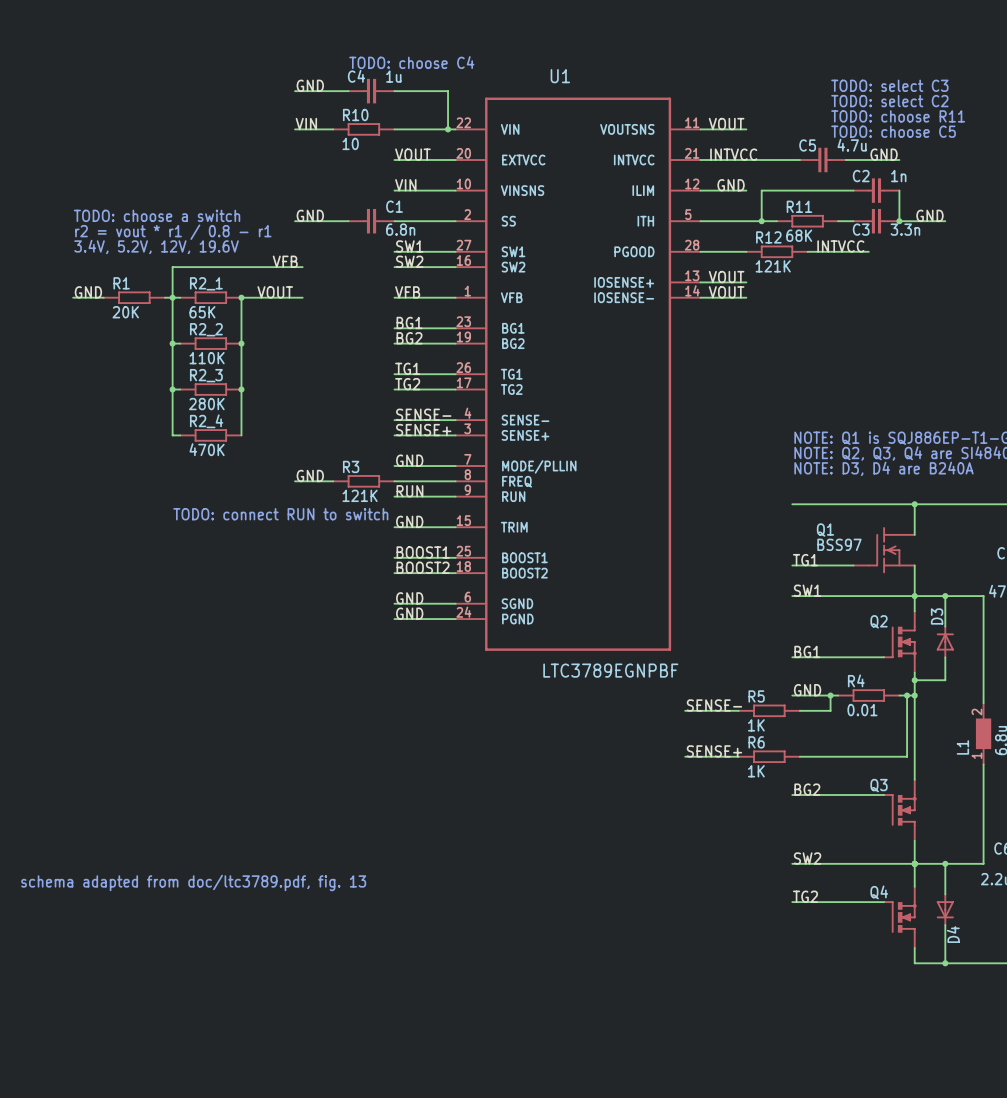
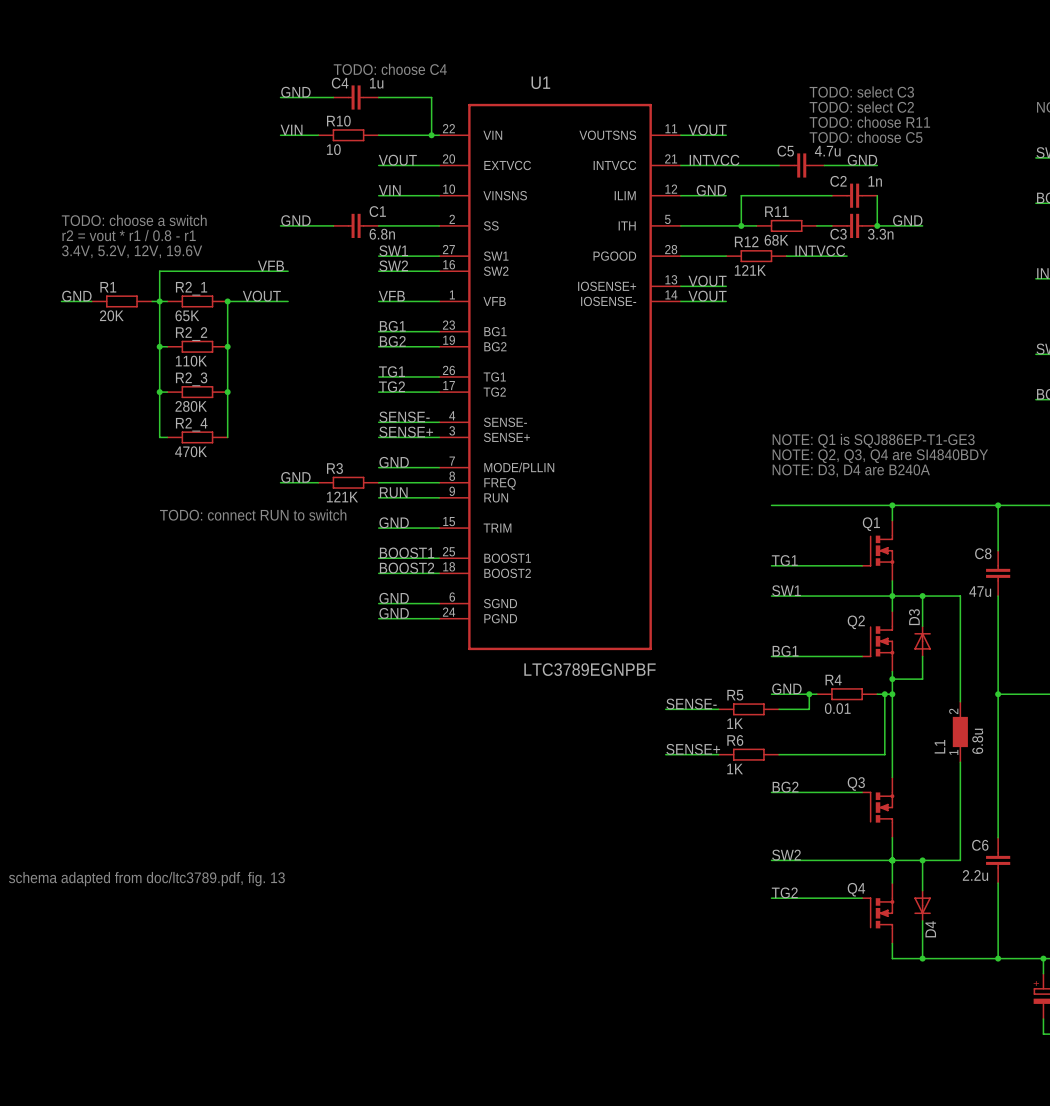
Q1 symbol: [853, 527, 915, 574] -> [861, 520, 895, 581]
Q1 name position: Q1 (825, 530) -> Q1 (871, 524)
Q1 value: BSS97 (839, 544) -> none

